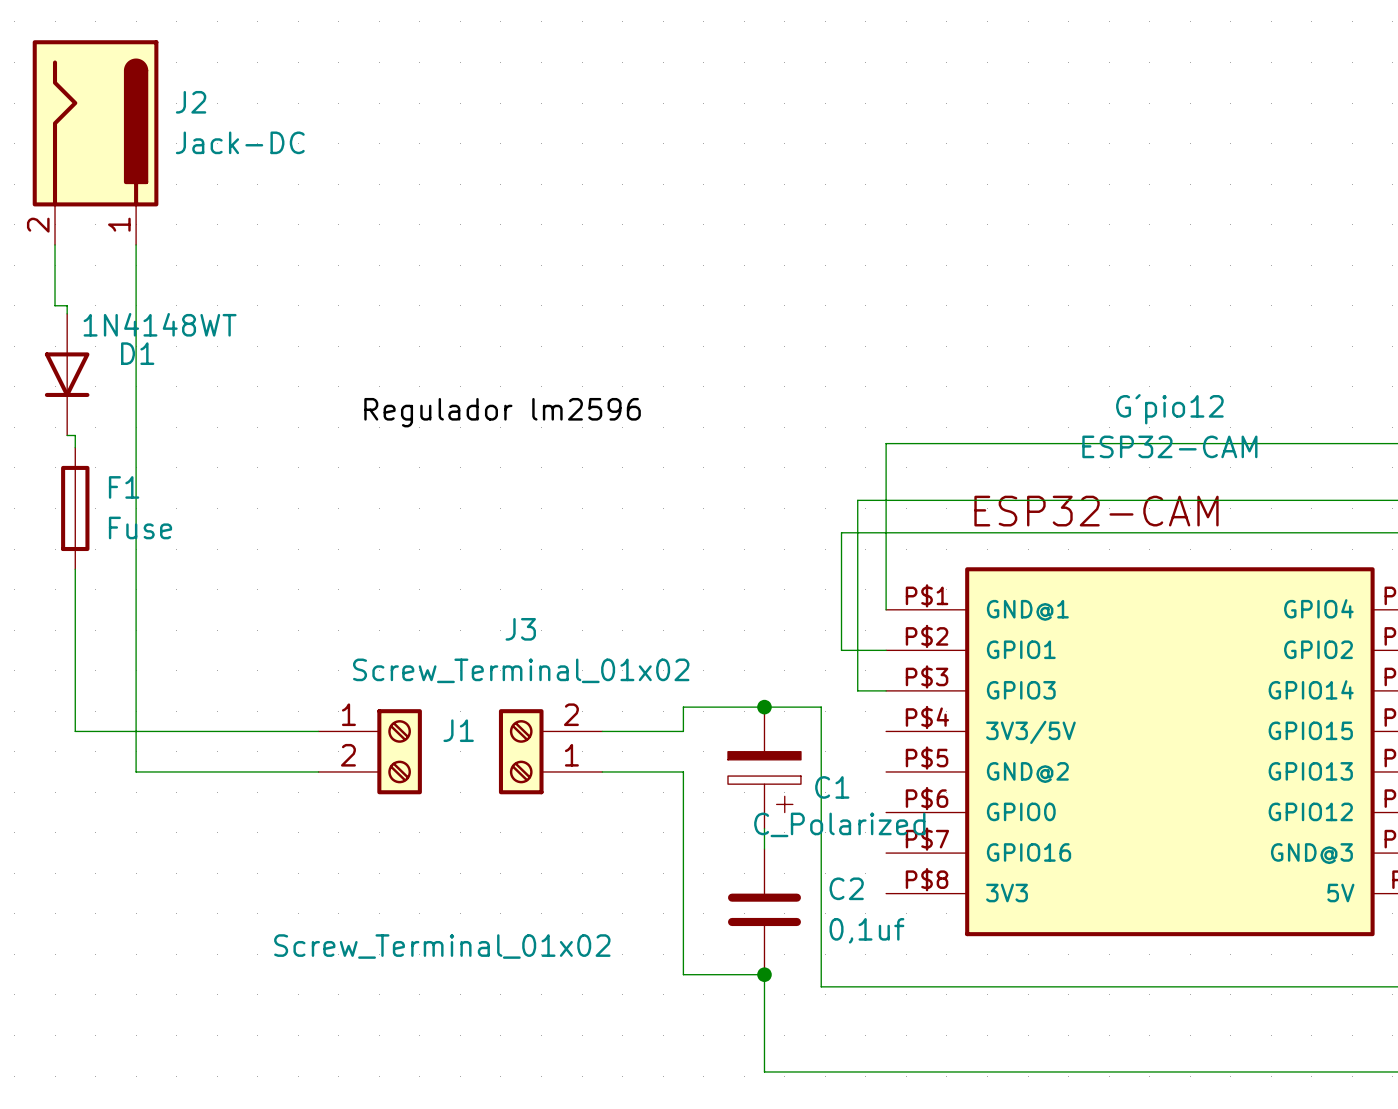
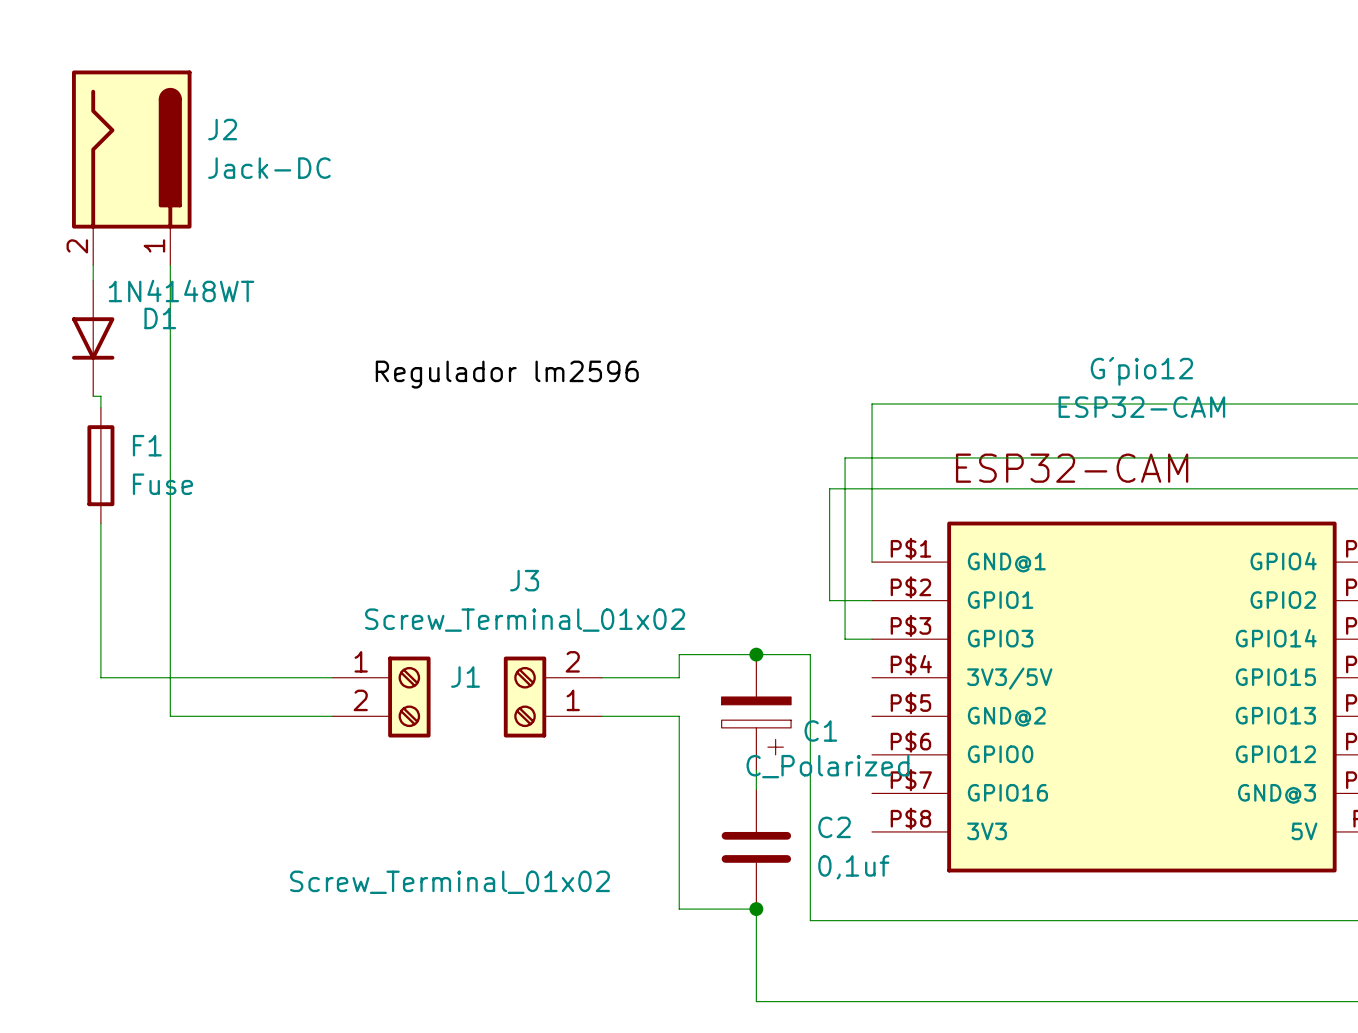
J2 position: (95, 142) -> (131, 167)
wire: (55, 244) (55, 305) (67, 305) -> (93, 265) (93, 272)
wire: (136, 244) (136, 771) (148, 771) -> (170, 265) (170, 716)

